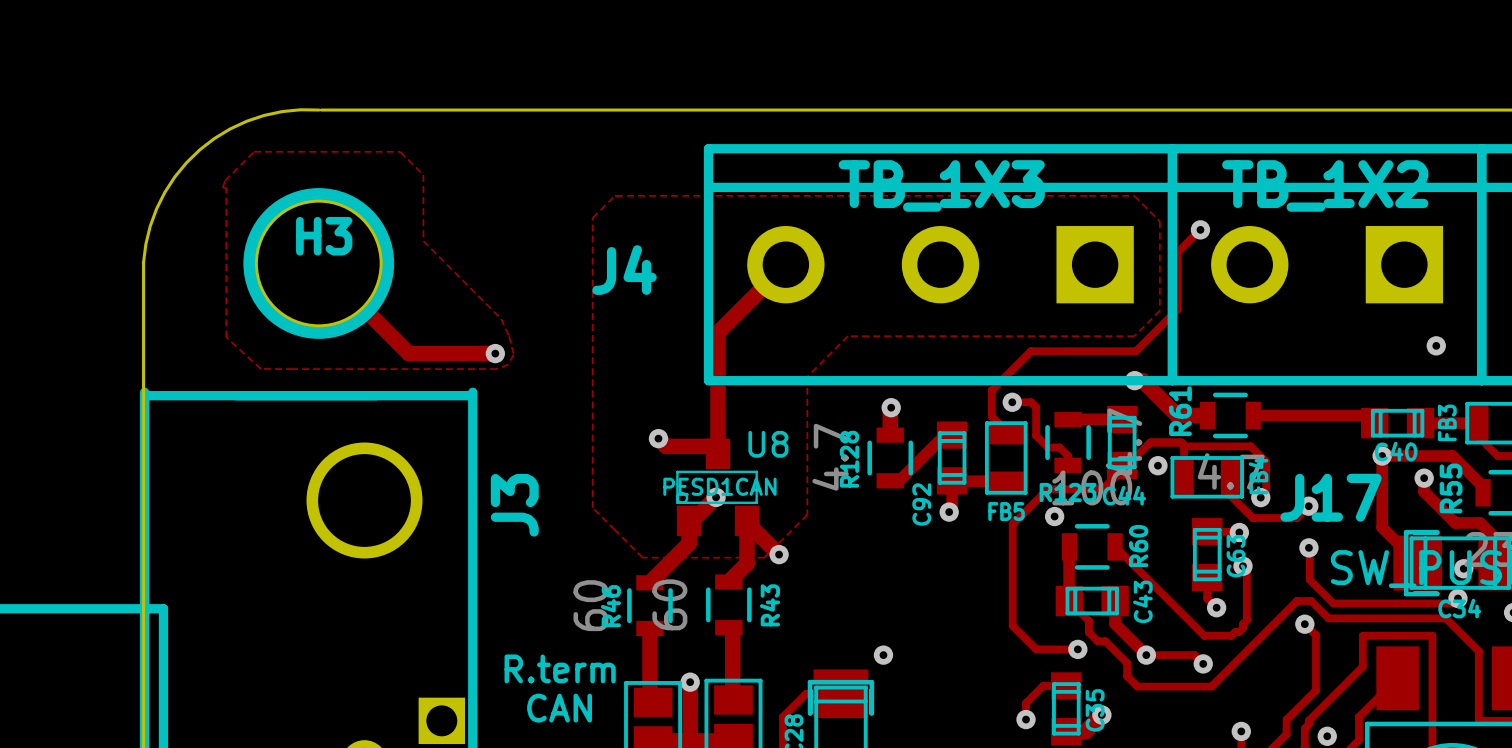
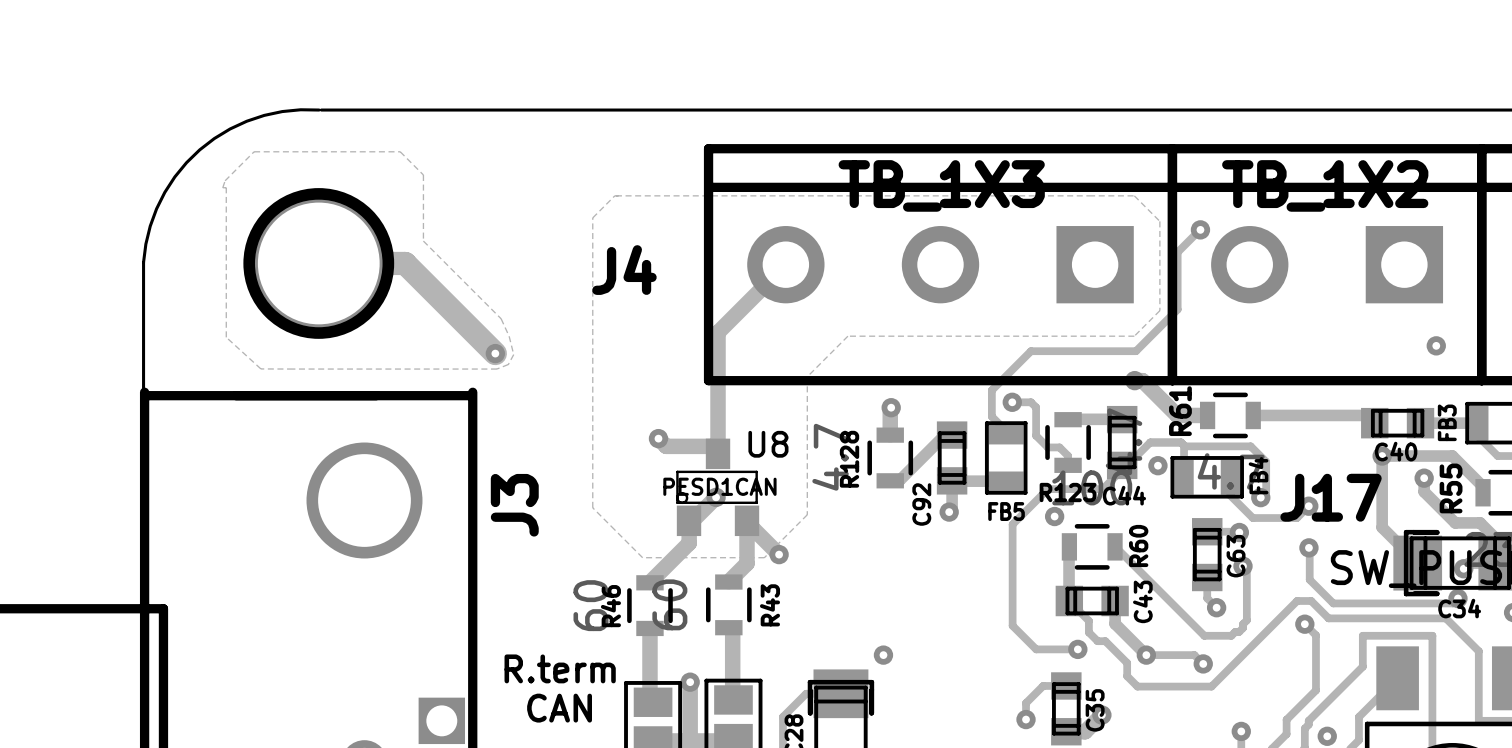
H3 name: H3 (324, 236) -> none
track: (318, 263) (408, 353) (495, 353) -> (318, 263) (405, 263) (495, 353)

